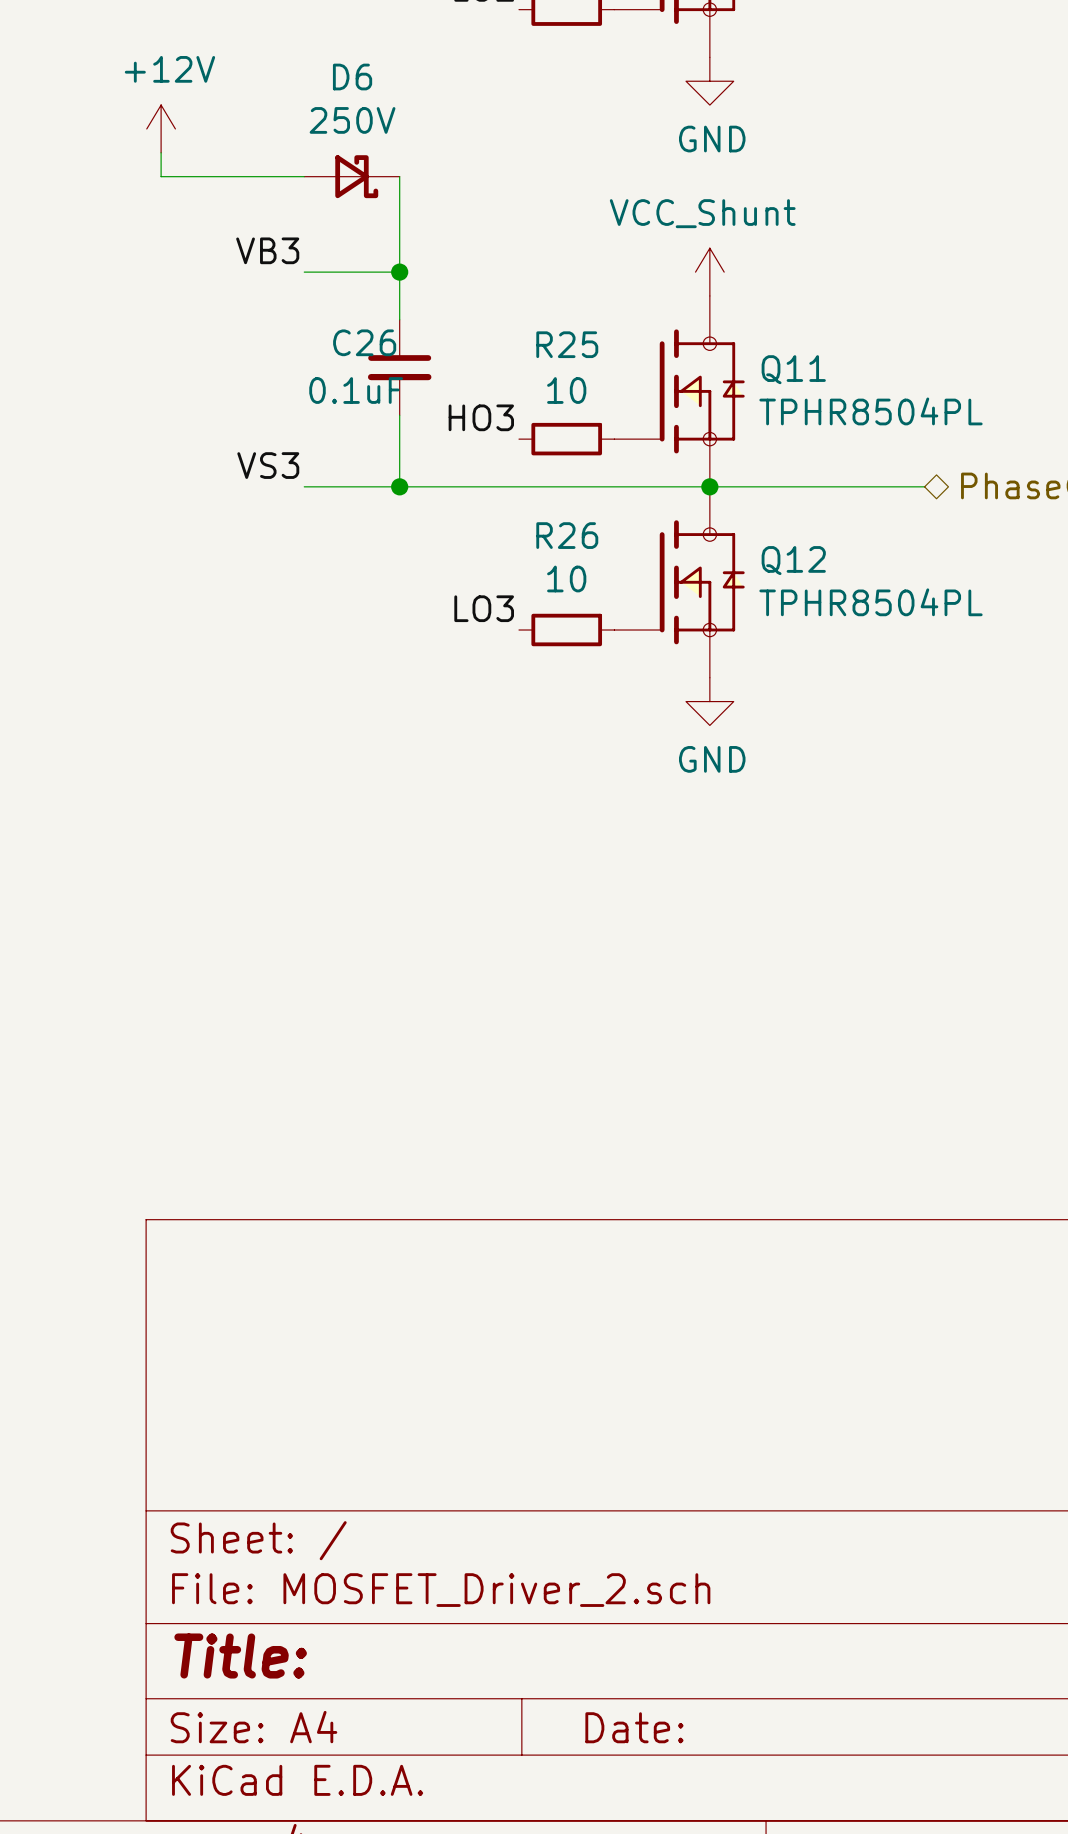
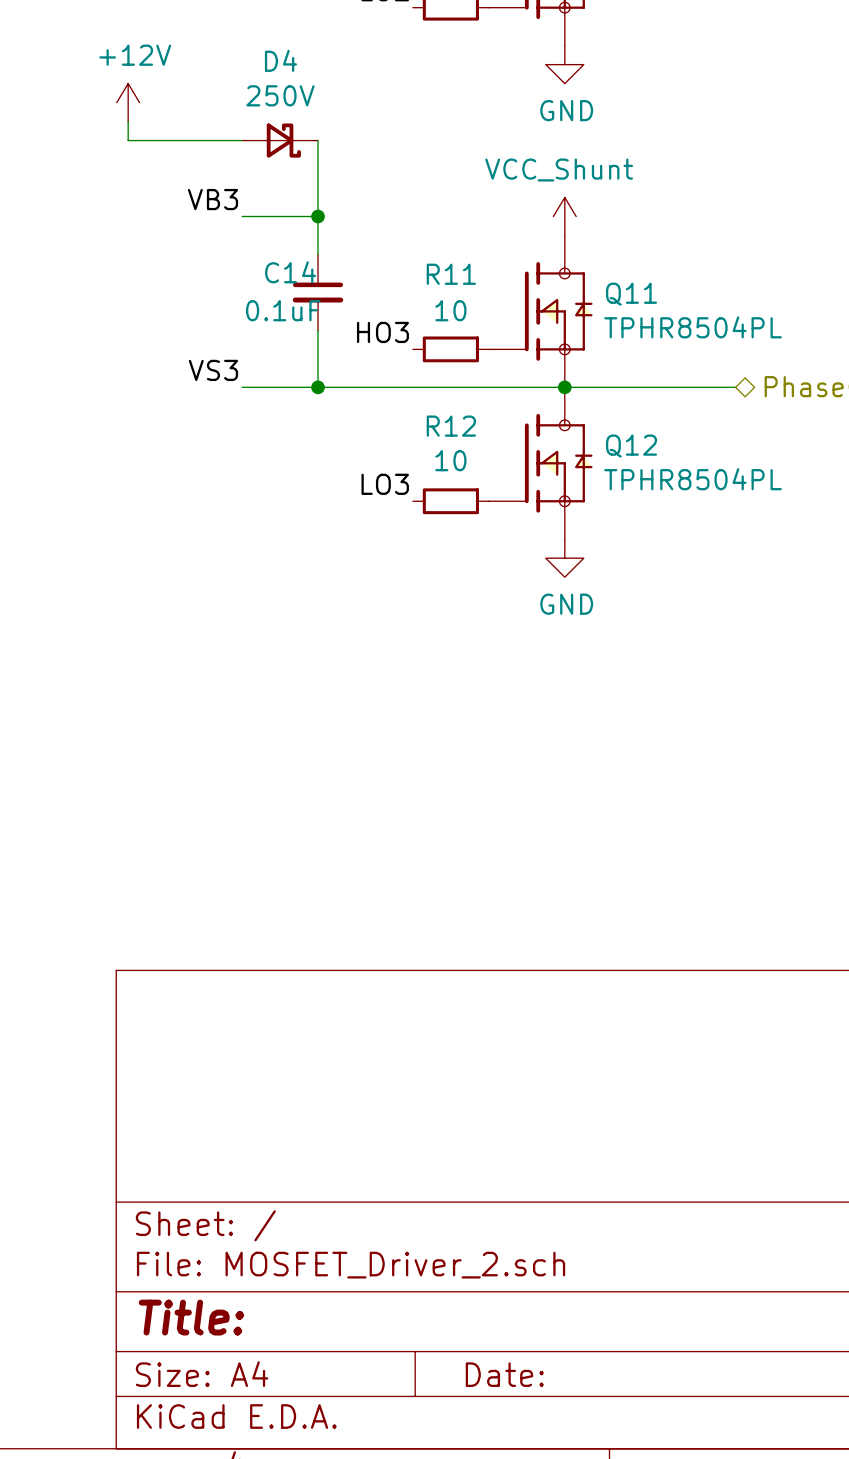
D6 name: D6 (352, 77) -> D4 (280, 60)
C26 name: C26 (364, 342) -> C14 (290, 272)
R25 name: R25 (567, 344) -> R11 (451, 274)
R26 name: R26 (567, 535) -> R12 (451, 426)

